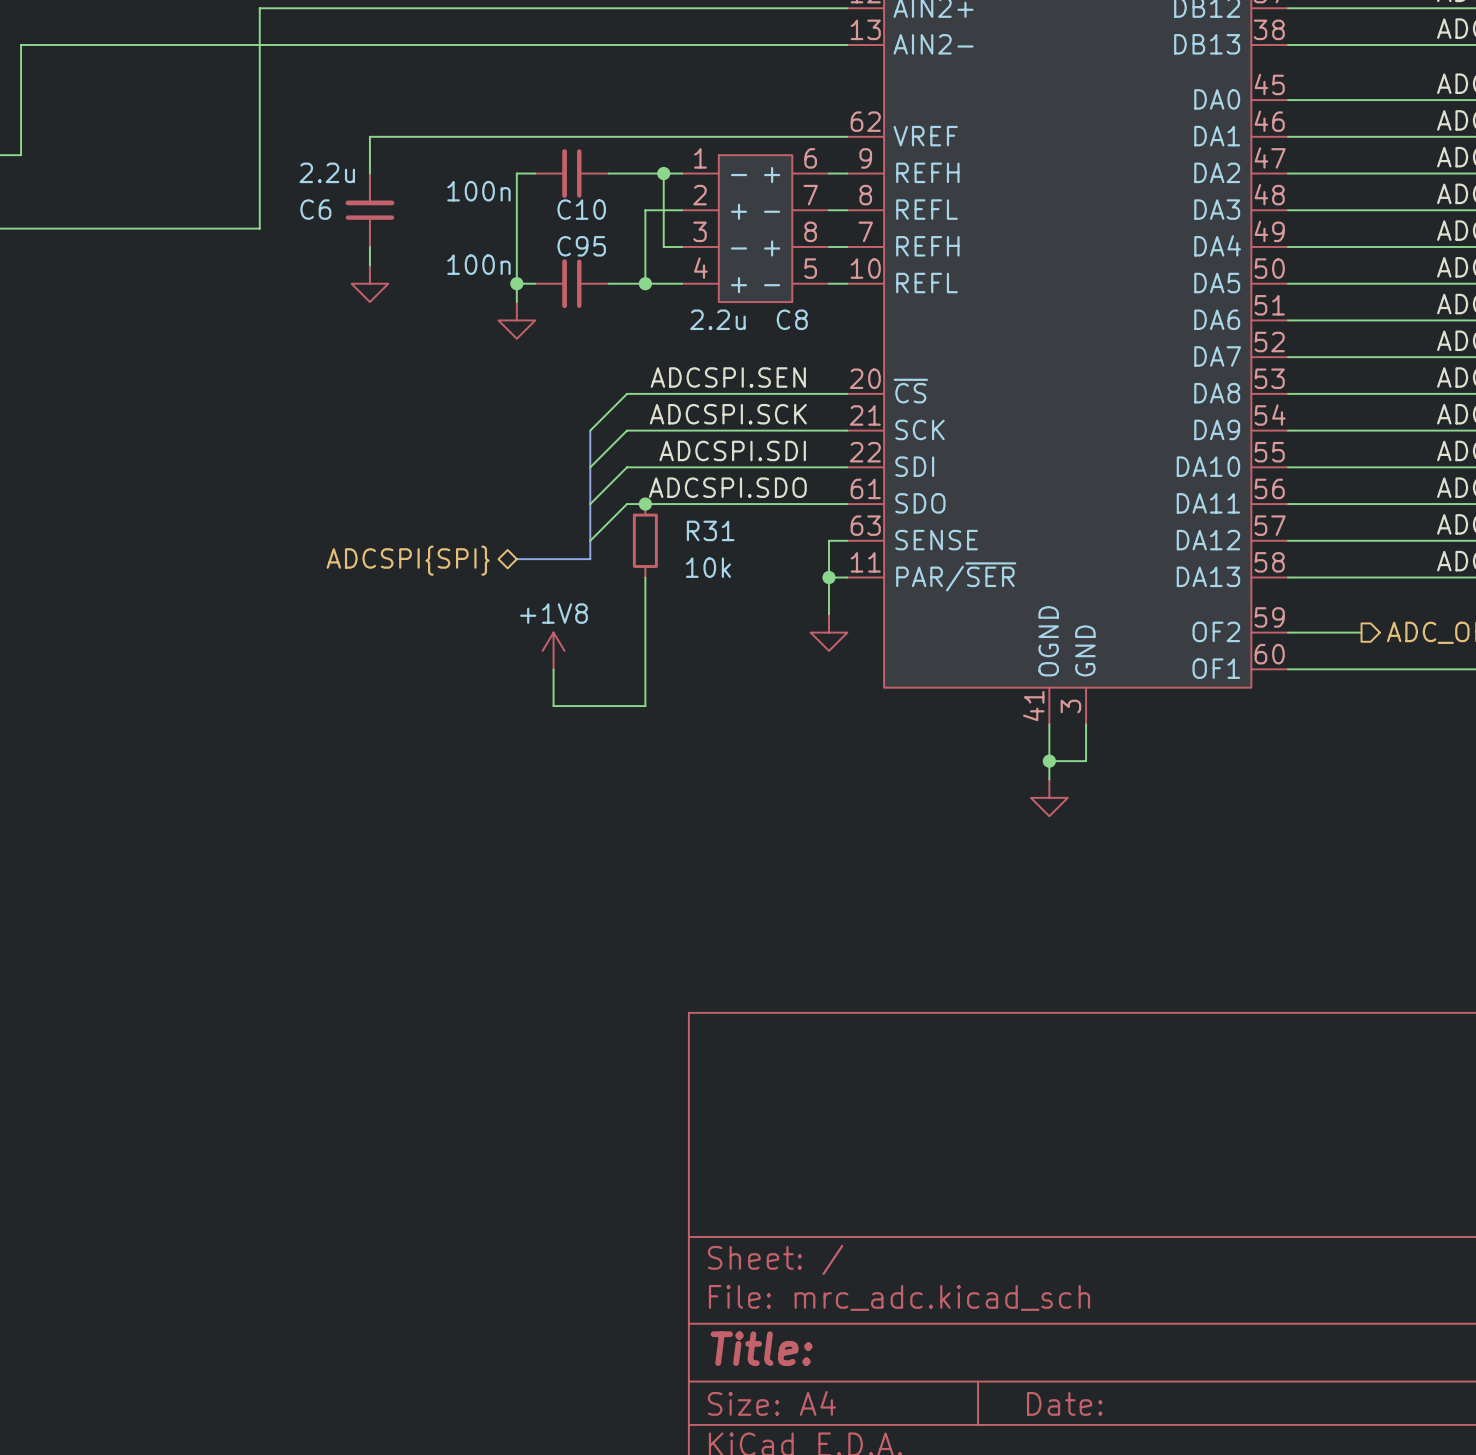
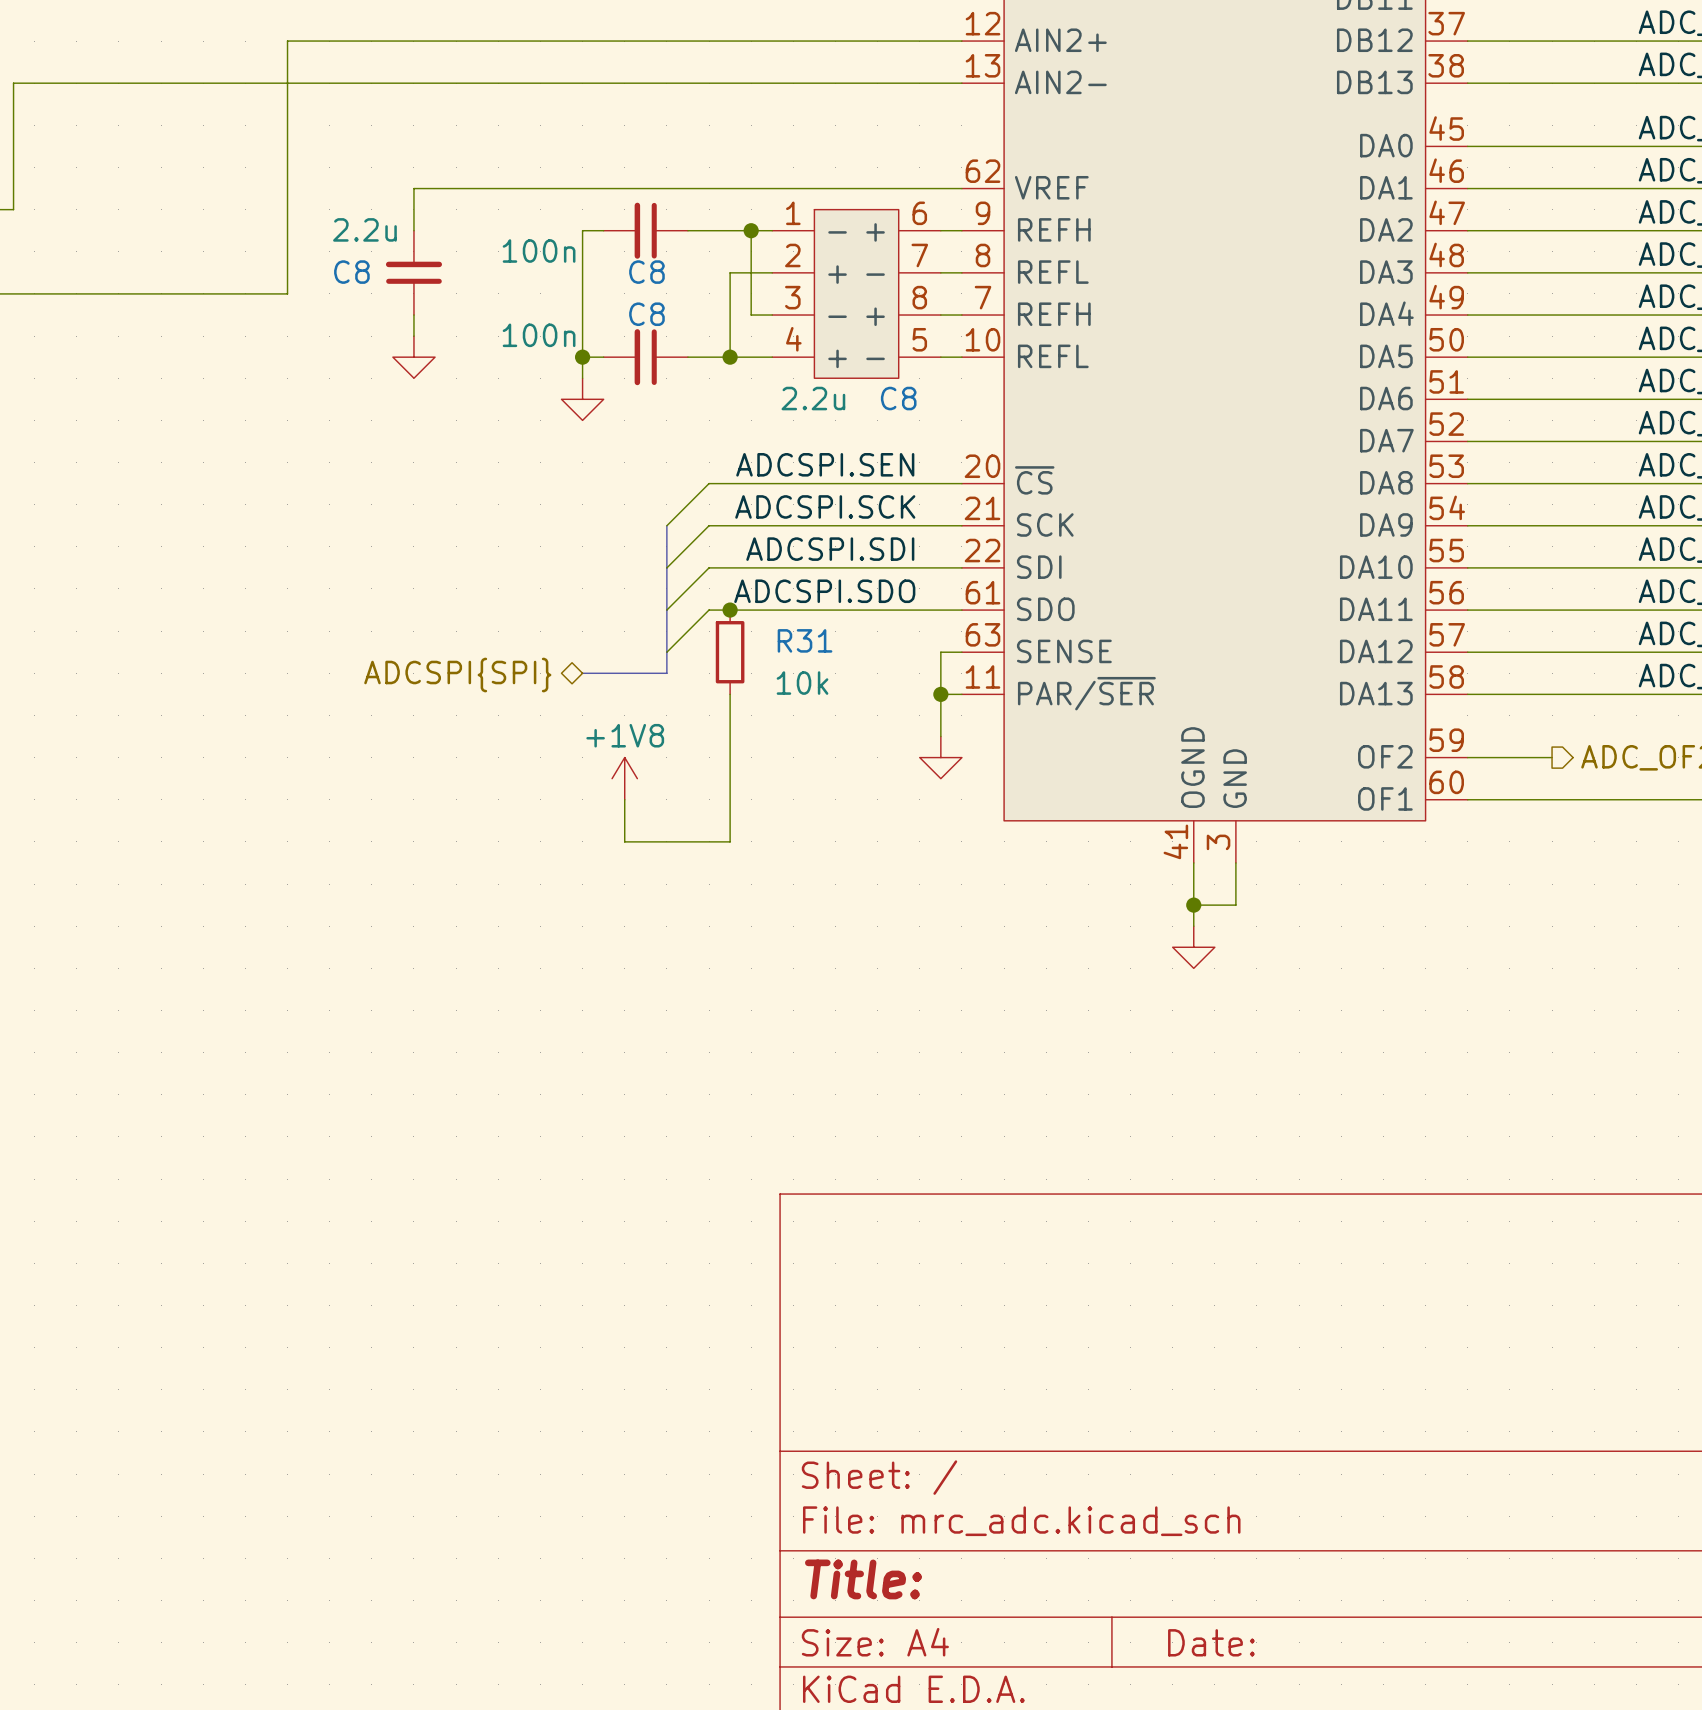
C6 name: C6 (315, 209) -> C8 (351, 272)
C10 name: C10 (581, 209) -> C8 (646, 272)
C95 name: C95 (581, 246) -> C8 (646, 314)

